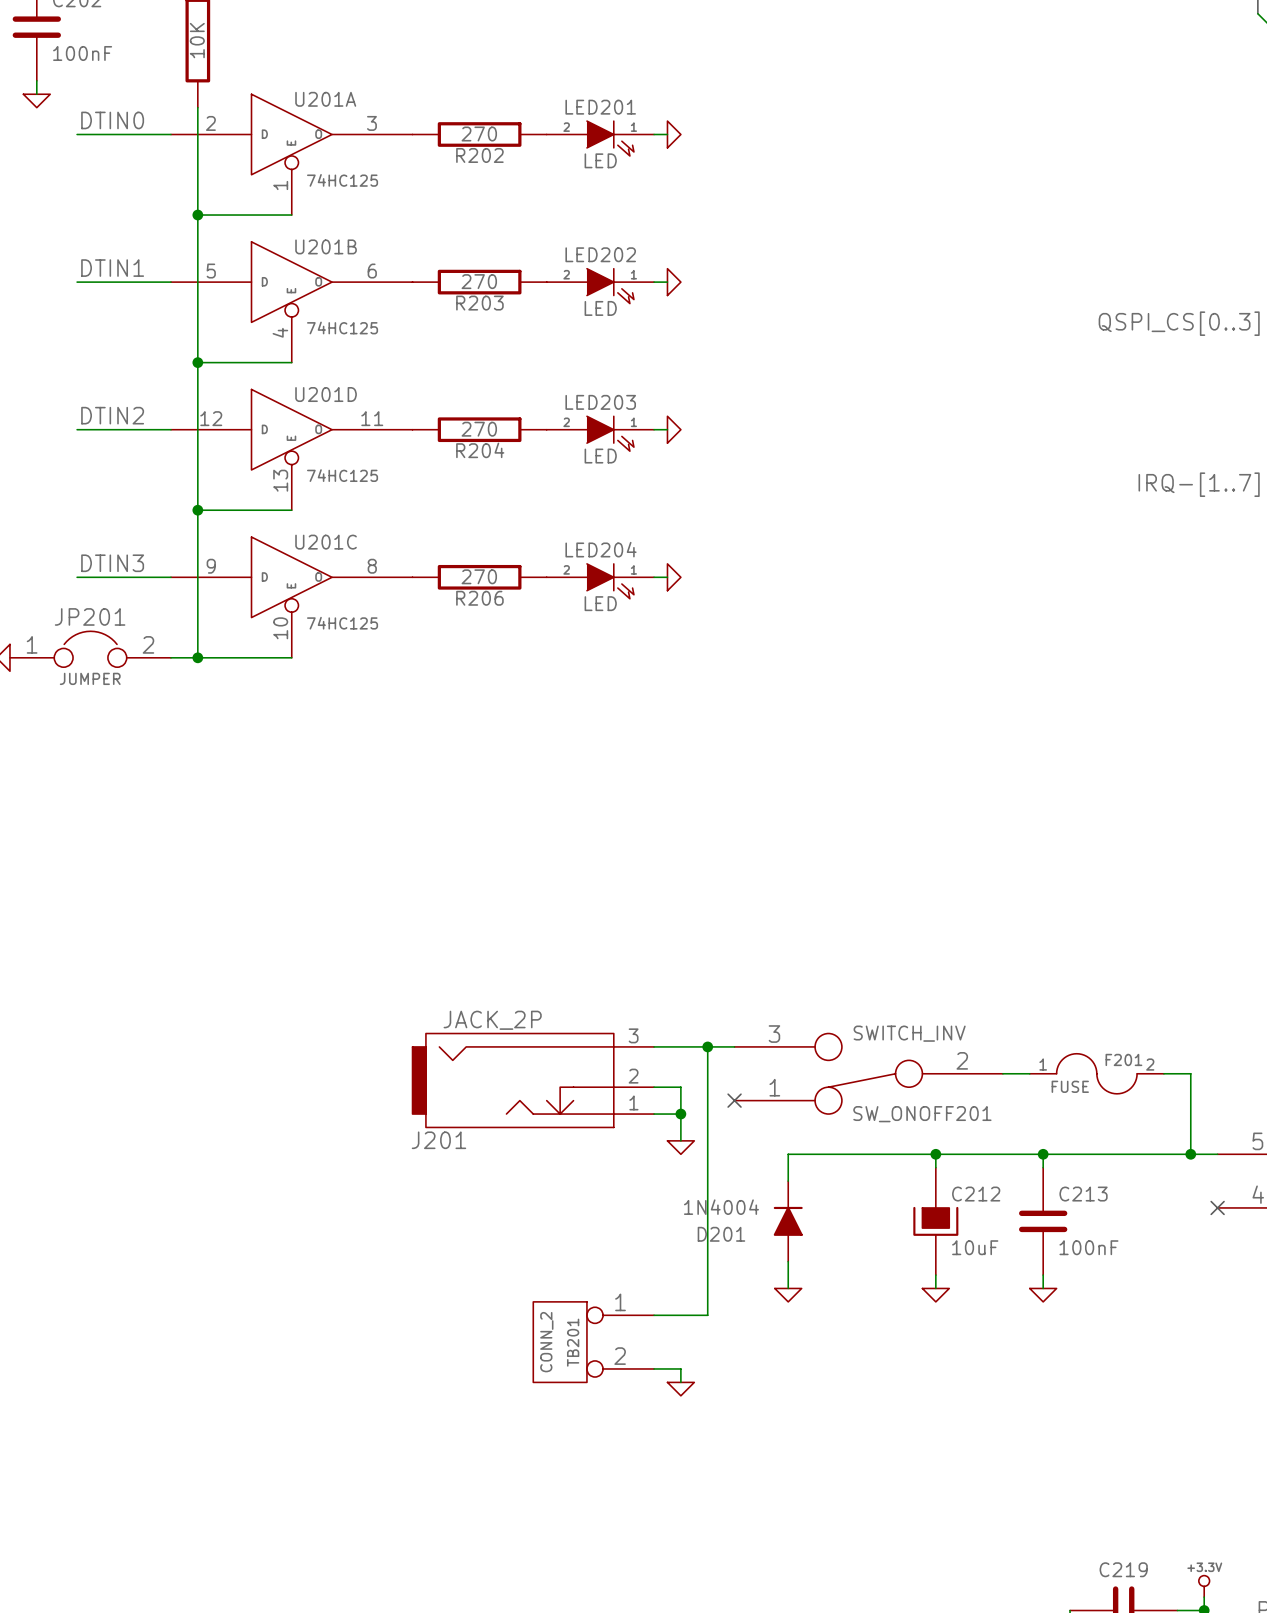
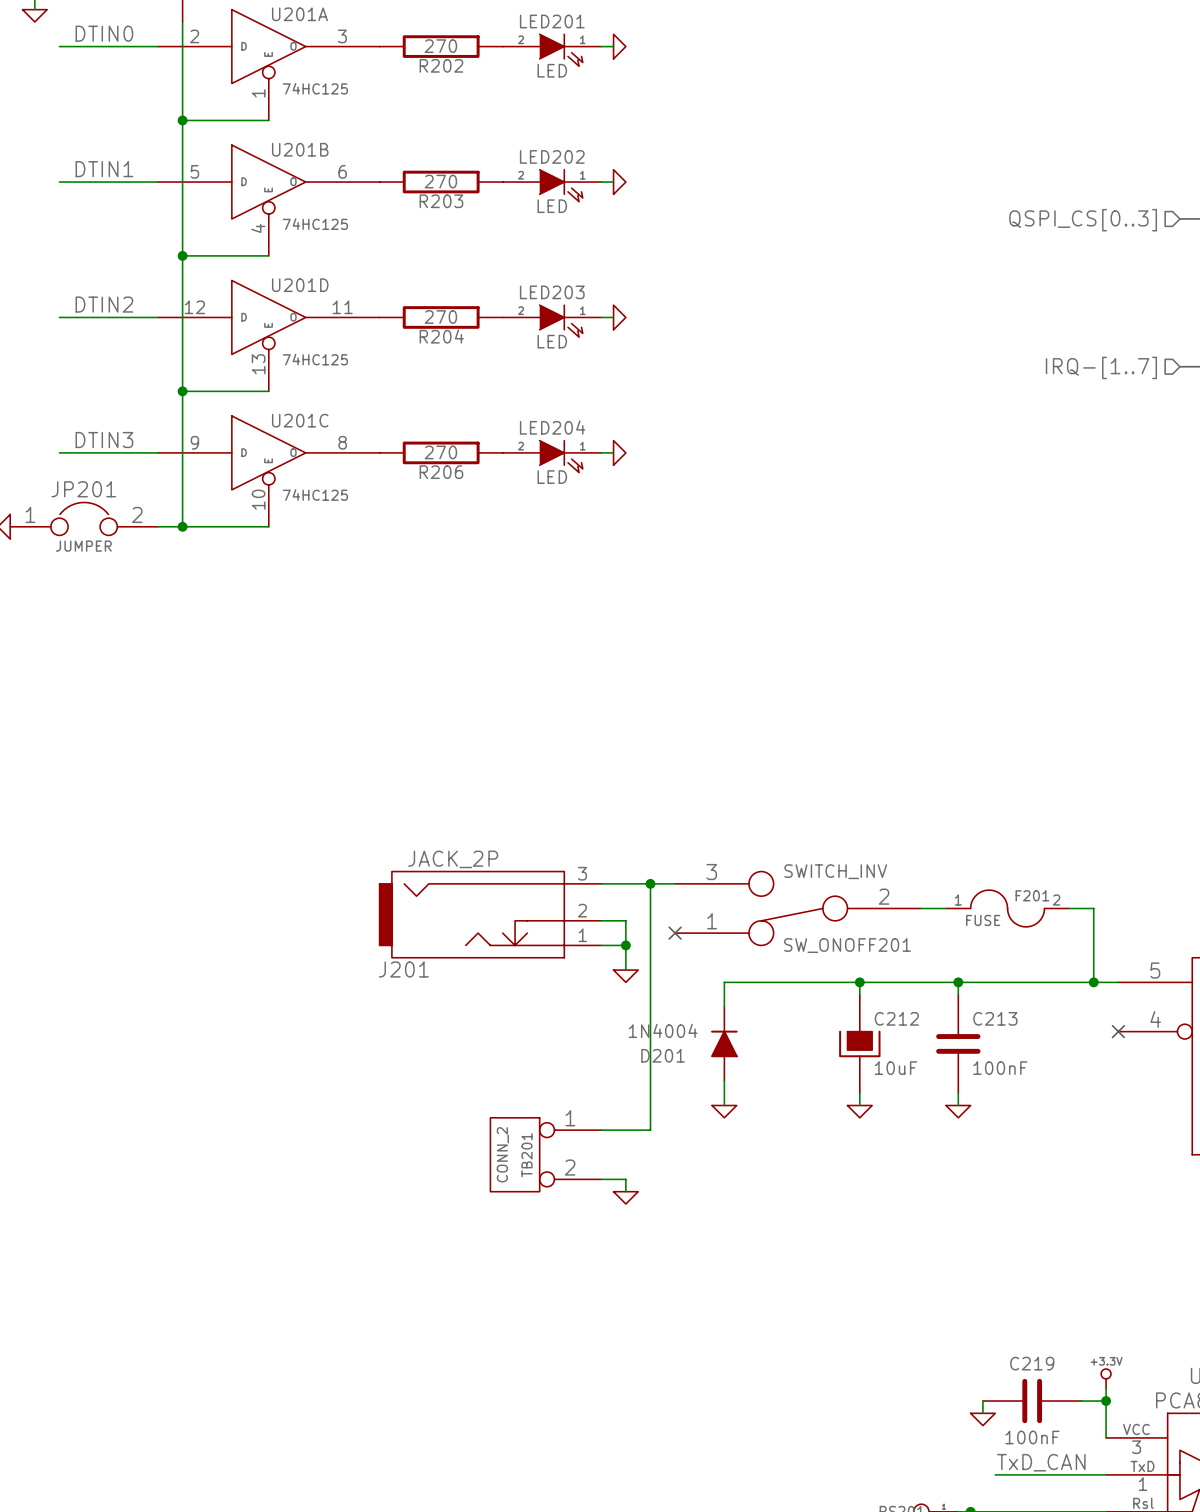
wire: none -> (59, 46) (71, 46)
wire: none -> (59, 182) (71, 182)
wire: none -> (59, 317) (71, 317)
wire: none -> (59, 452) (71, 452)

